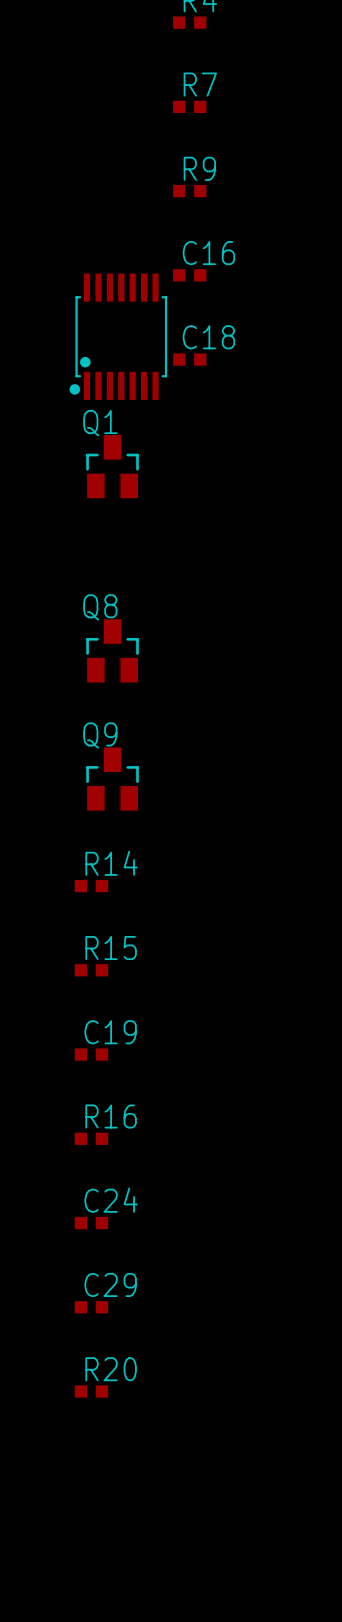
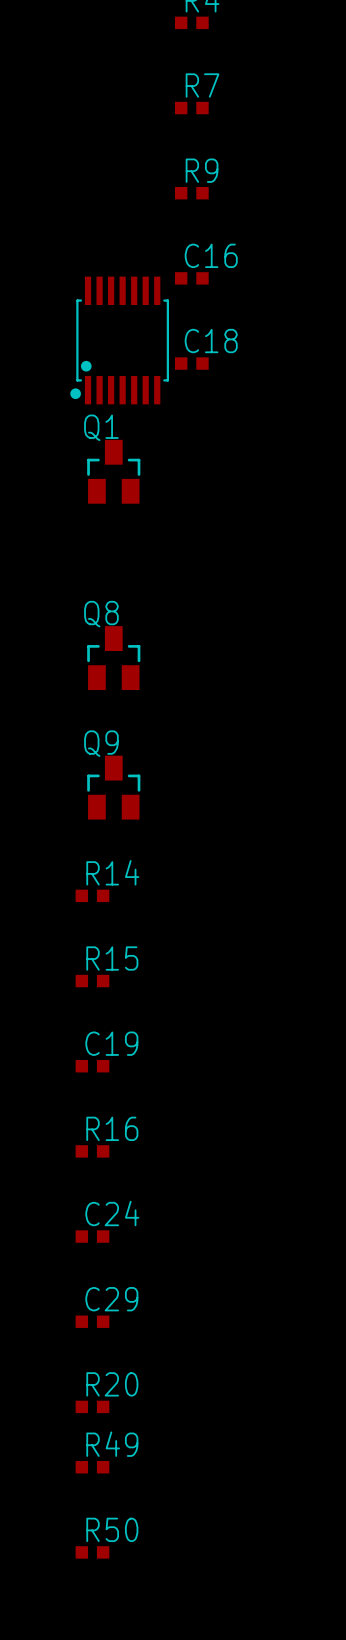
R49: none -> (92, 1467)
R50: none -> (92, 1552)

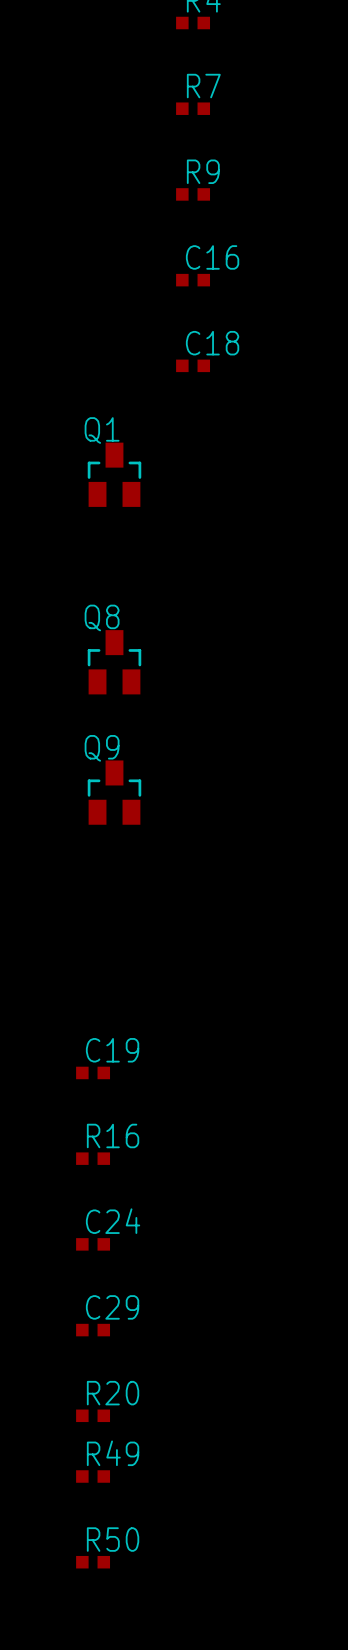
part: (119, 340) -> none
R14: (92, 895) -> none
R15: (92, 981) -> none

